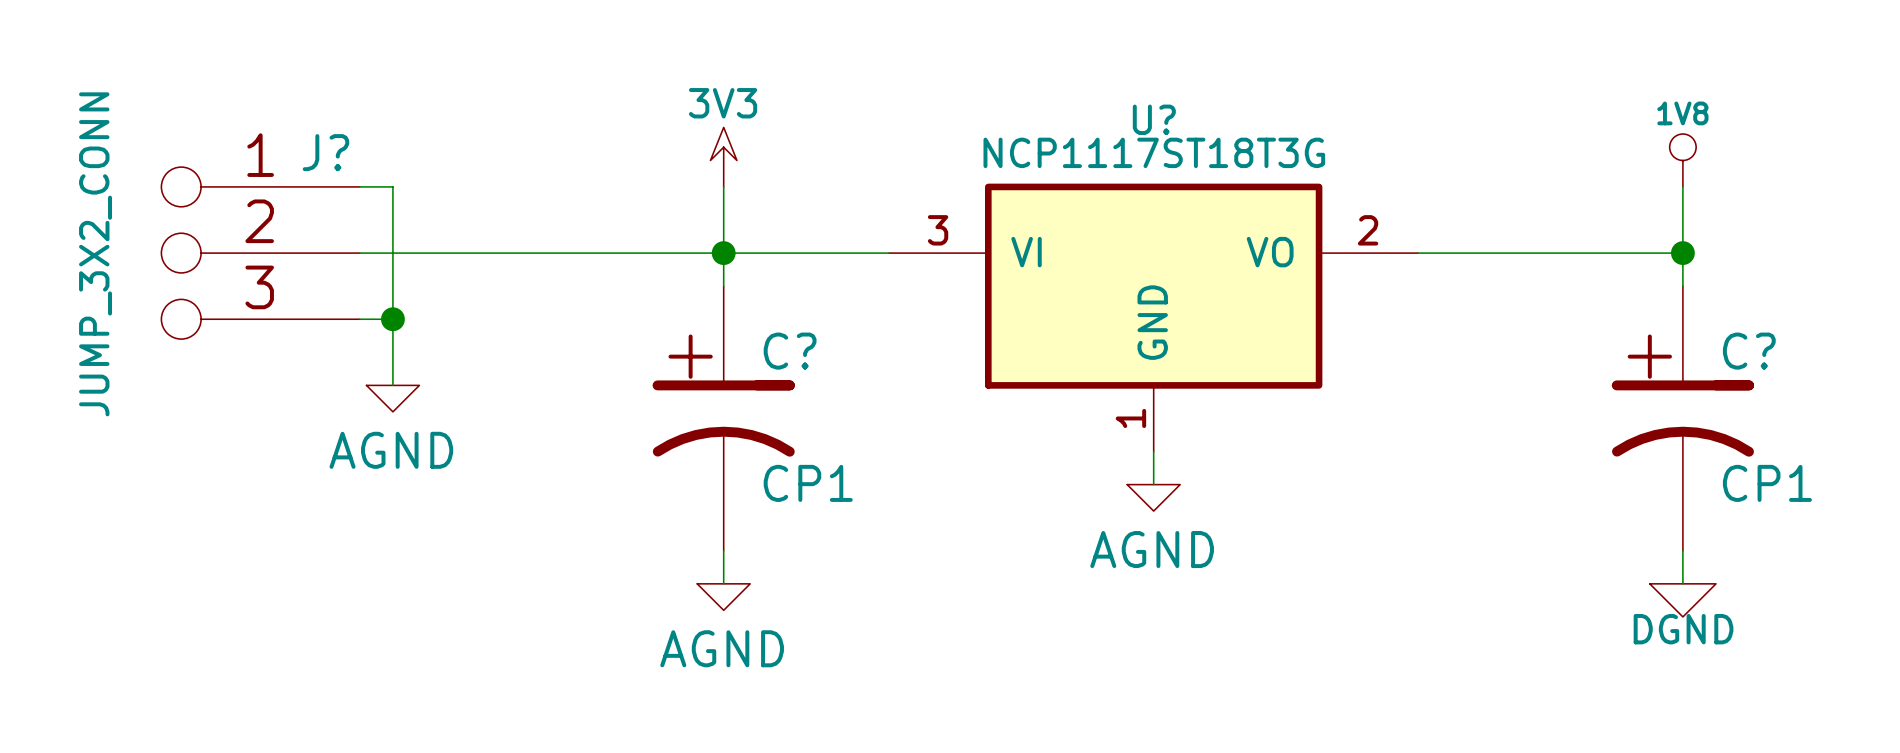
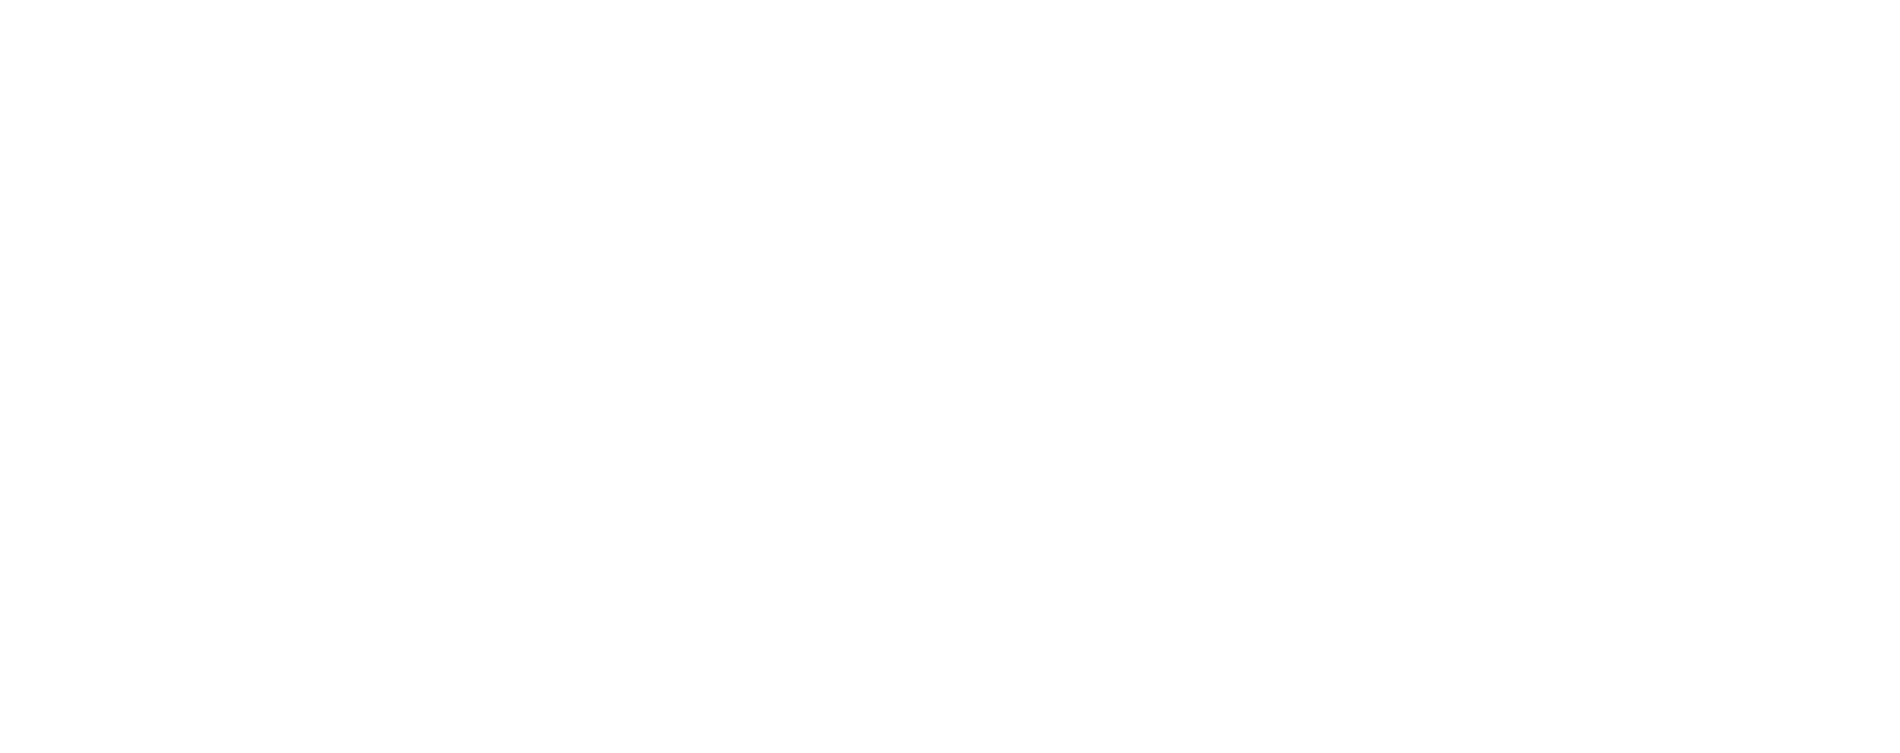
power symbol: 3V3 (723, 157) -> none
power symbol: 1V8 (1682, 160) -> none
wire: (359, 186) (392, 186) (392, 385) -> none
wire: (723, 186) (723, 286) -> none
wire: (1682, 186) (1682, 286) -> none
J?: JUMP_3X2_CONN (260, 253) -> none
wire: (359, 253) (889, 253) -> none
junction: (723, 253) -> none
wire: (1418, 253) (1682, 253) -> none
junction: (1682, 253) -> none
U?: NCP1117ST18T3G (1153, 317) -> none
wire: (359, 319) (392, 319) -> none
junction: (392, 319) -> none
power symbol: AGND (392, 398) -> none
C?: CP1 (723, 418) -> none
C?: CP1 (1682, 418) -> none
wire: (1153, 451) (1153, 484) -> none
power symbol: AGND (1153, 497) -> none
wire: (723, 550) (723, 583) -> none
wire: (1682, 550) (1682, 583) -> none
power symbol: AGND (723, 597) -> none
power symbol: DGND (1682, 600) -> none

